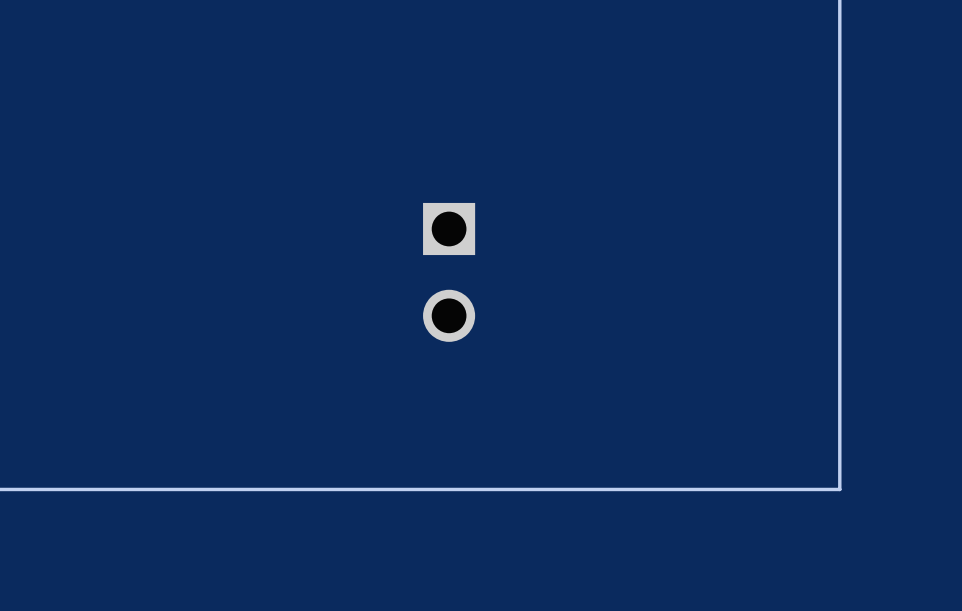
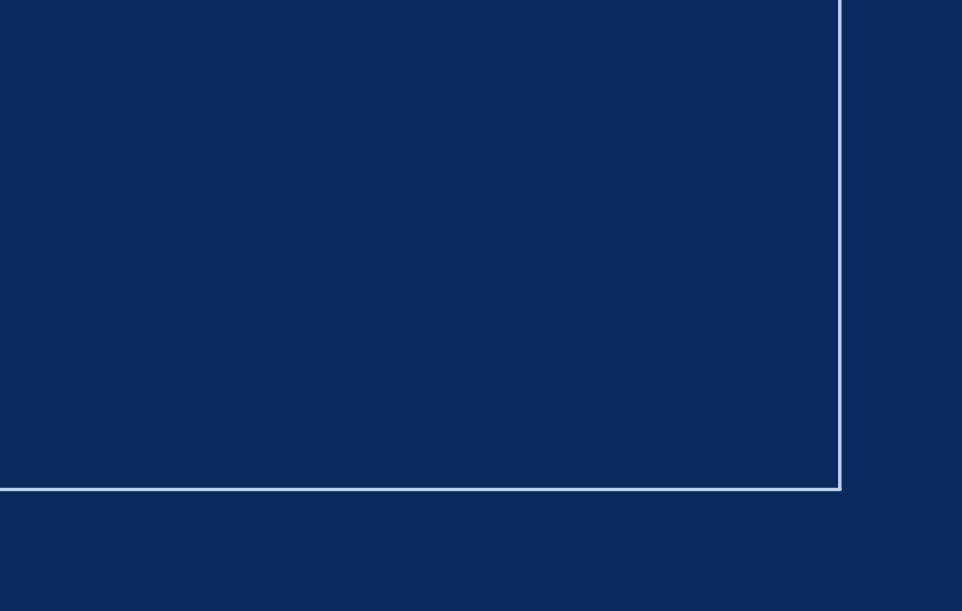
part: (449, 272) -> none

